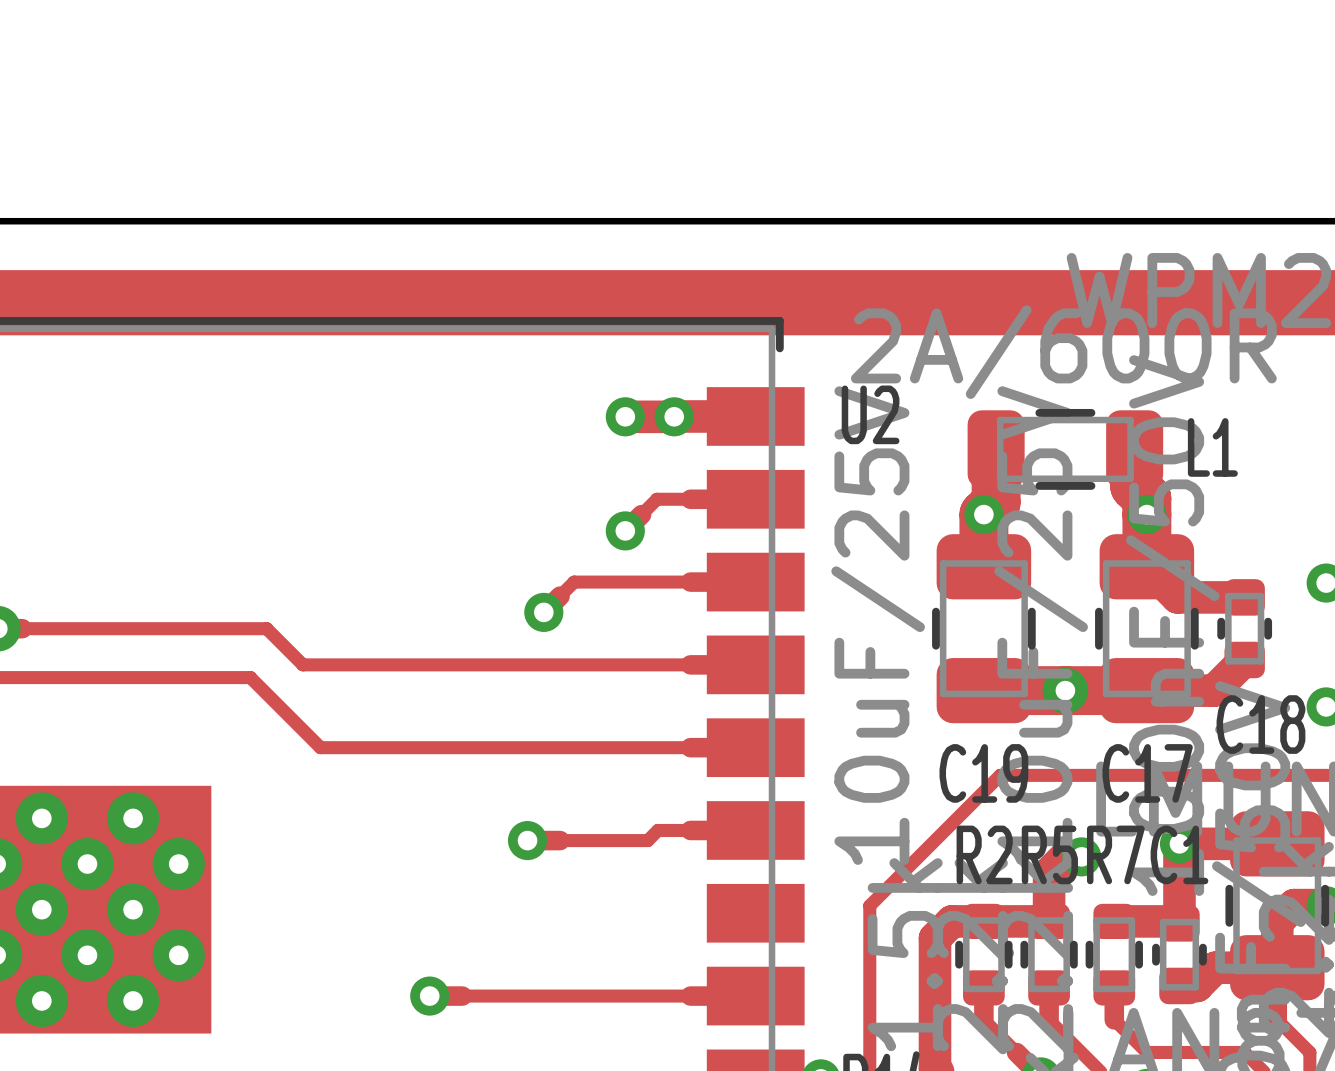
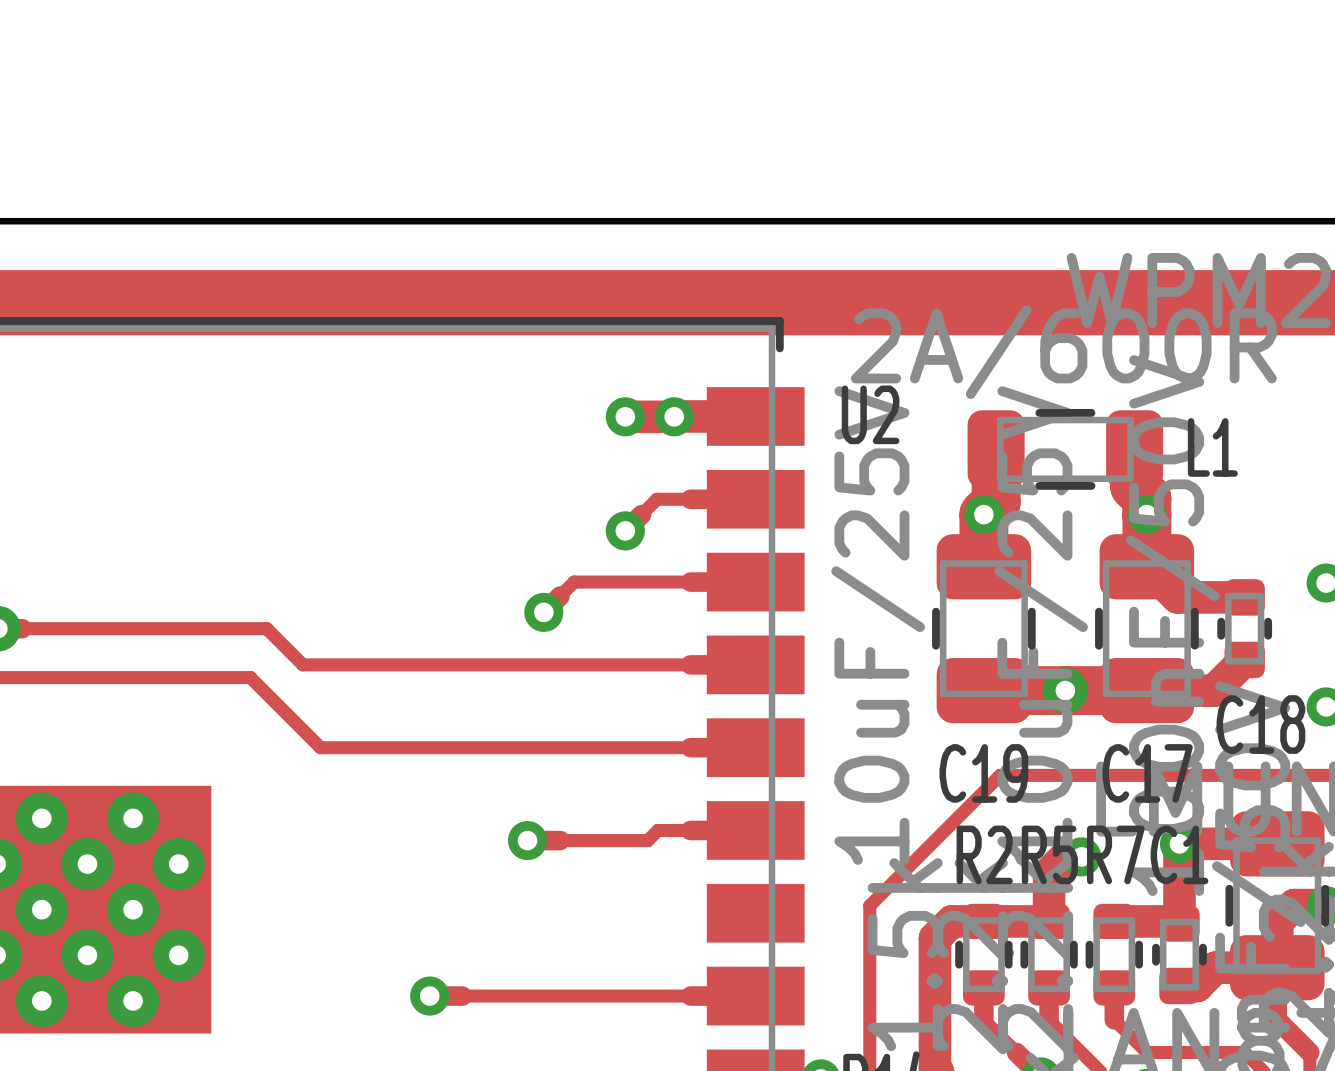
track width: thin (1277, 1019) (1309, 1052) -> thick (1277, 1019) (1309, 1052)

